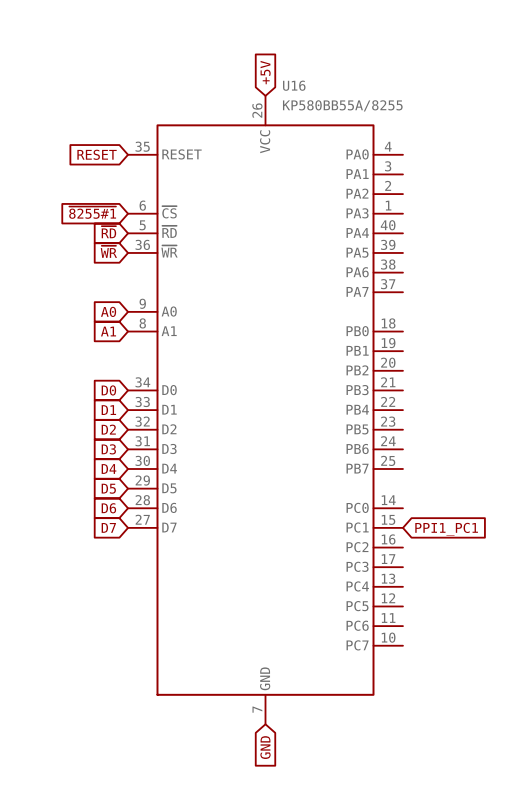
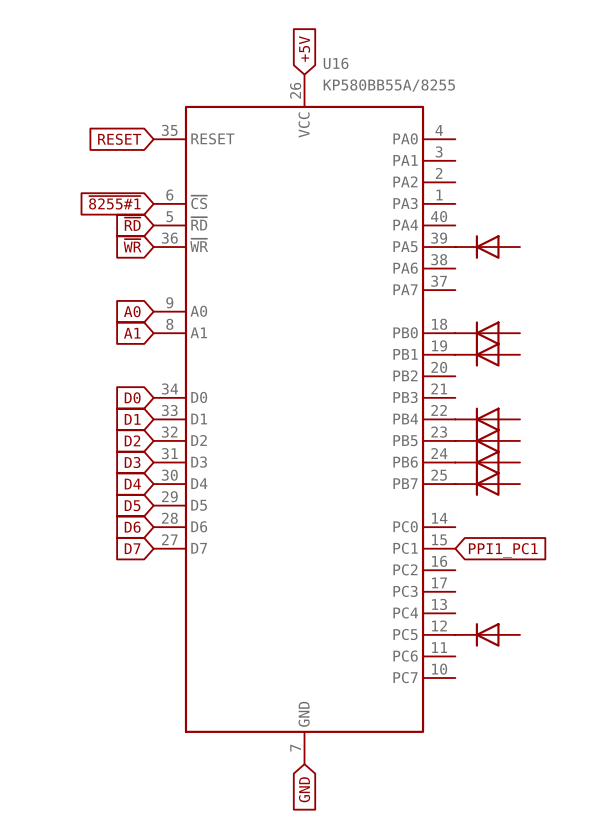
part: none -> (487, 247)
part: none -> (487, 333)
part: none -> (487, 354)
part: none -> (487, 419)
part: none -> (487, 440)
part: none -> (487, 462)
part: none -> (487, 484)
part: none -> (487, 634)

